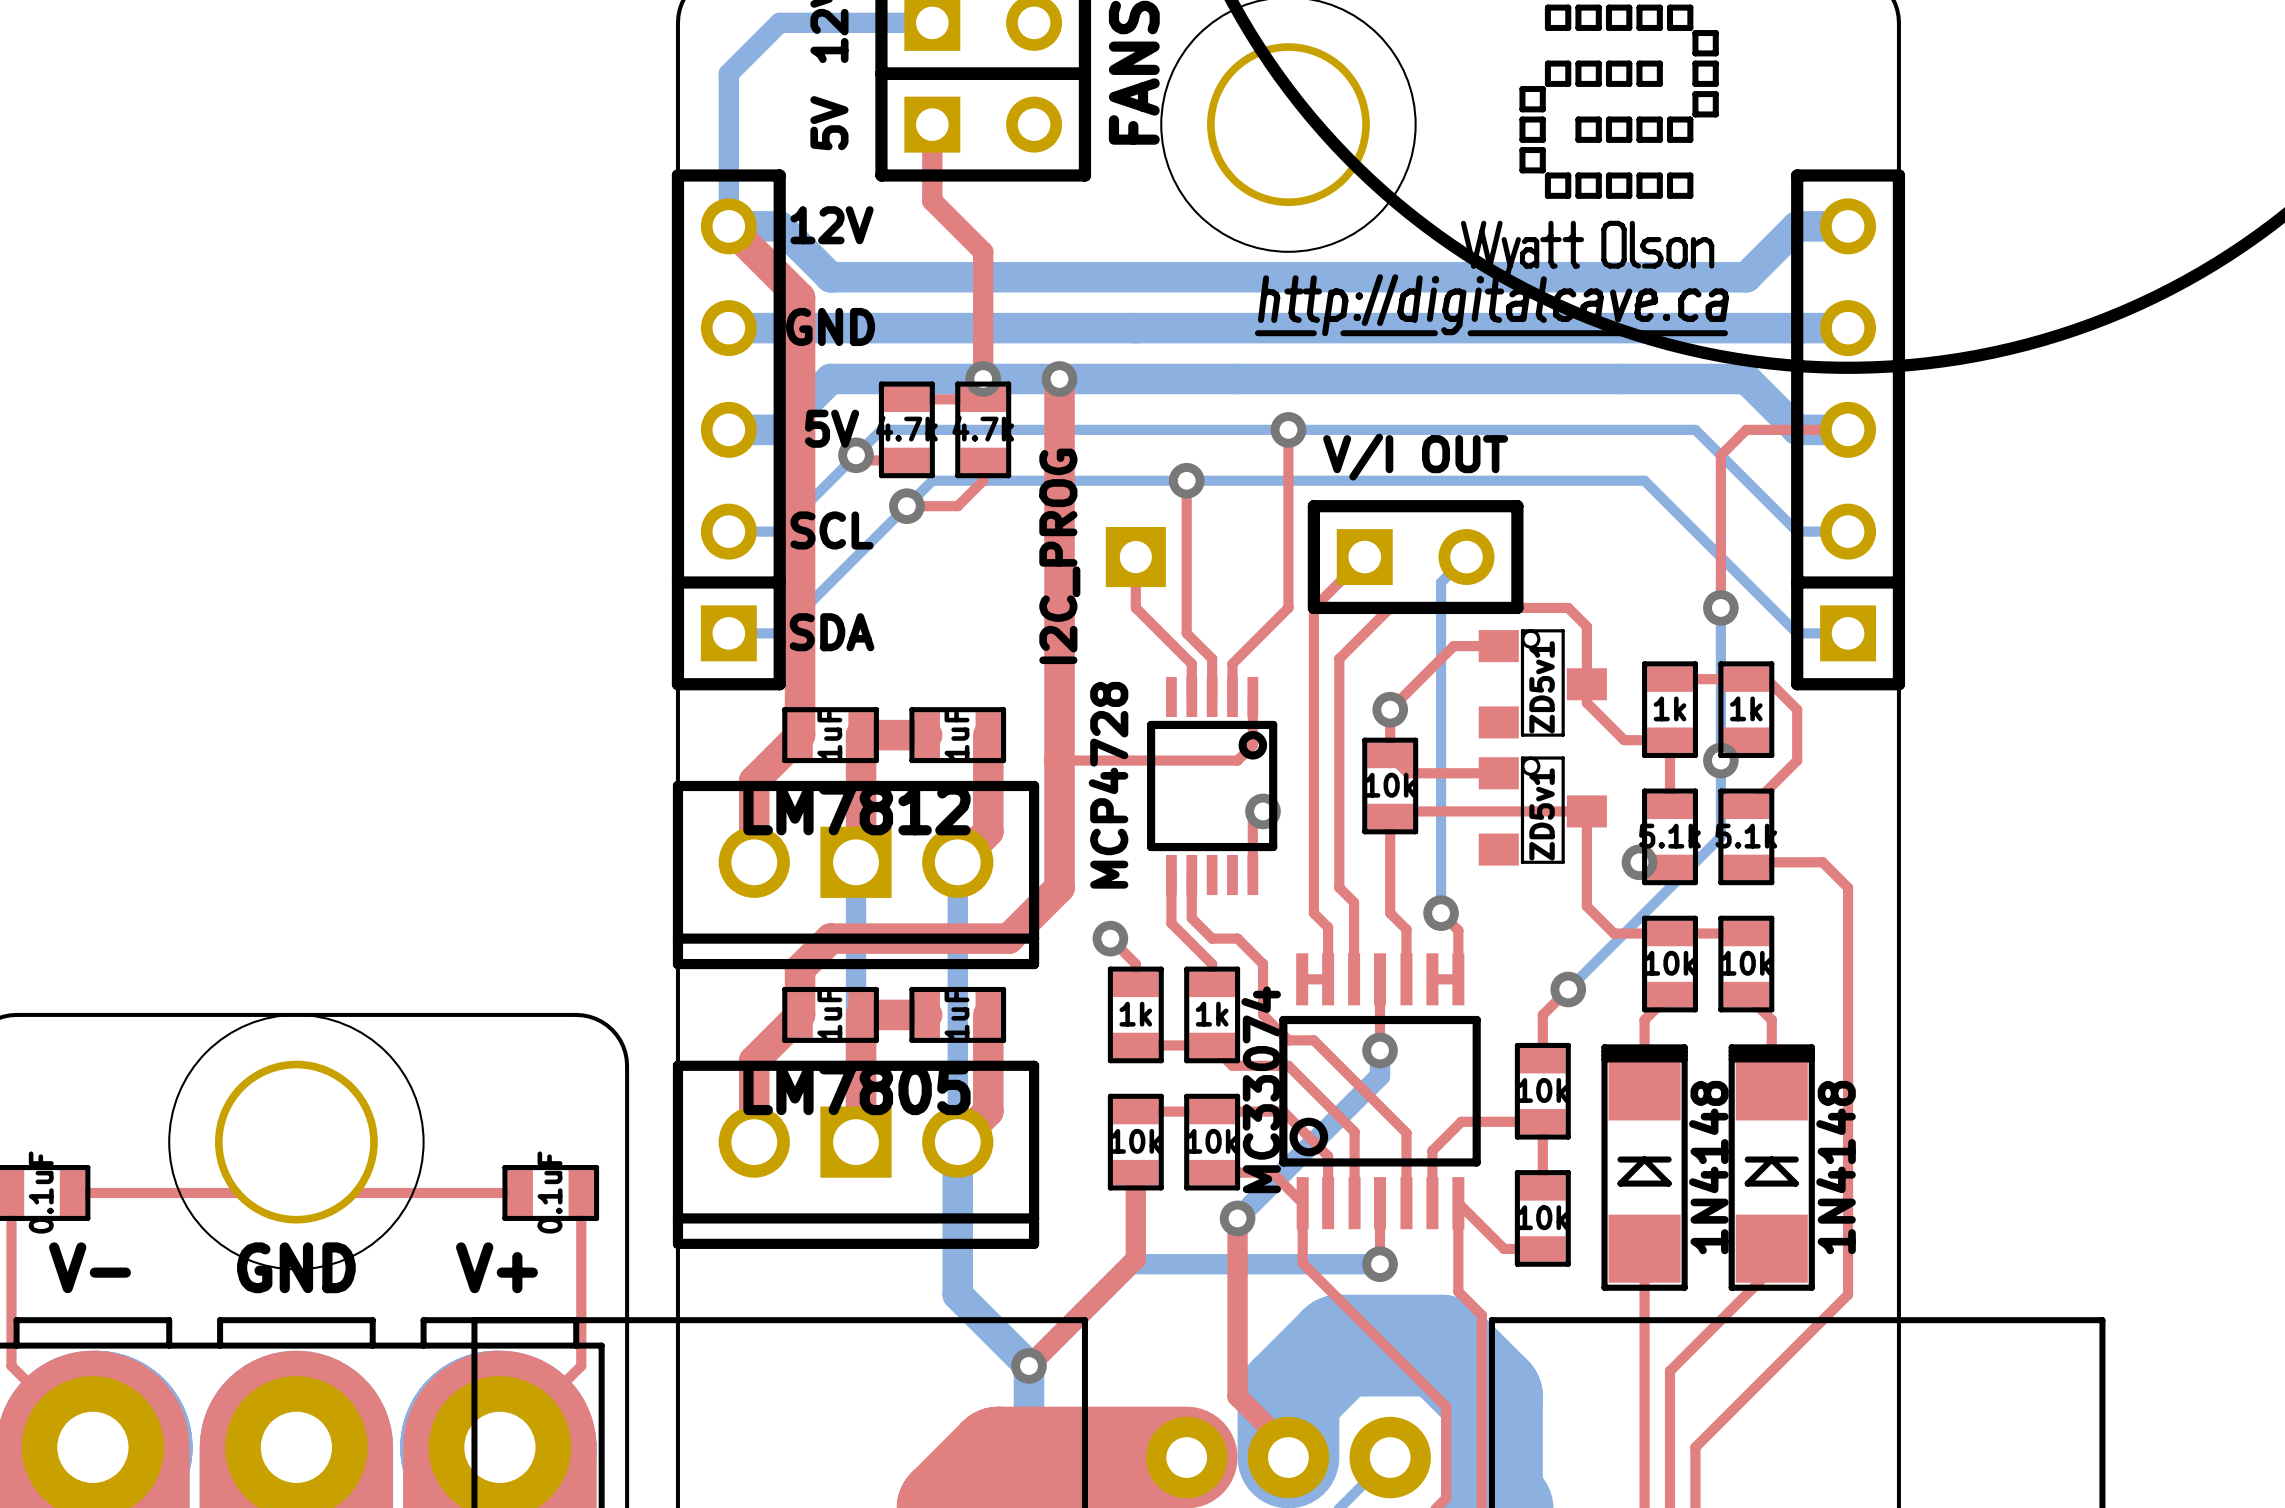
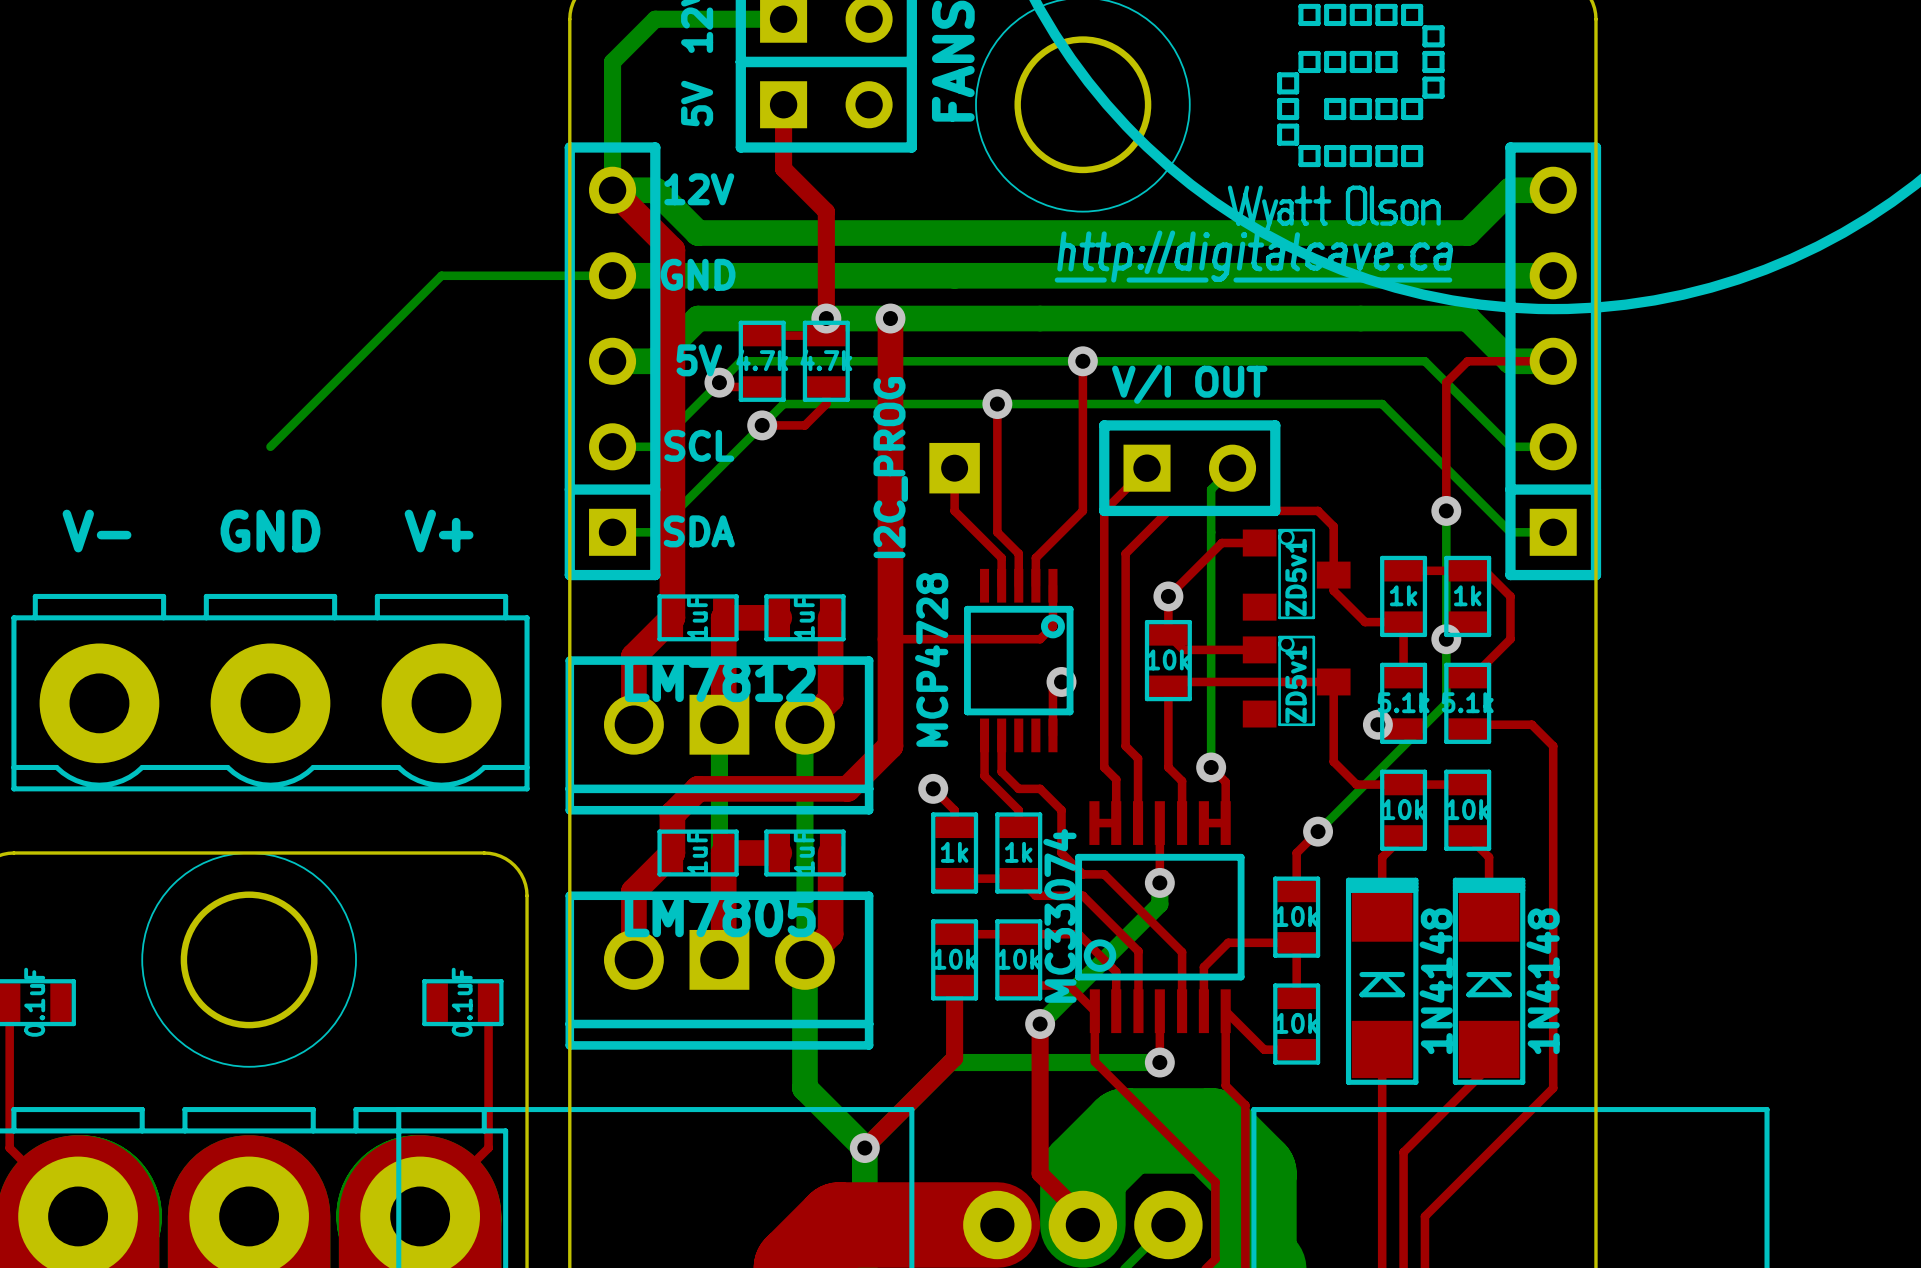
bottom track: none -> (612, 275) (441, 275) (270, 446)
part: none -> (270, 692)
top track: (72, 1192) (245, 1192) (296, 1142) (347, 1192) (520, 1192) -> none
part text: V- (89, 1267) -> none
part text: GND (296, 1267) -> none
part text: V+ (496, 1267) -> none

